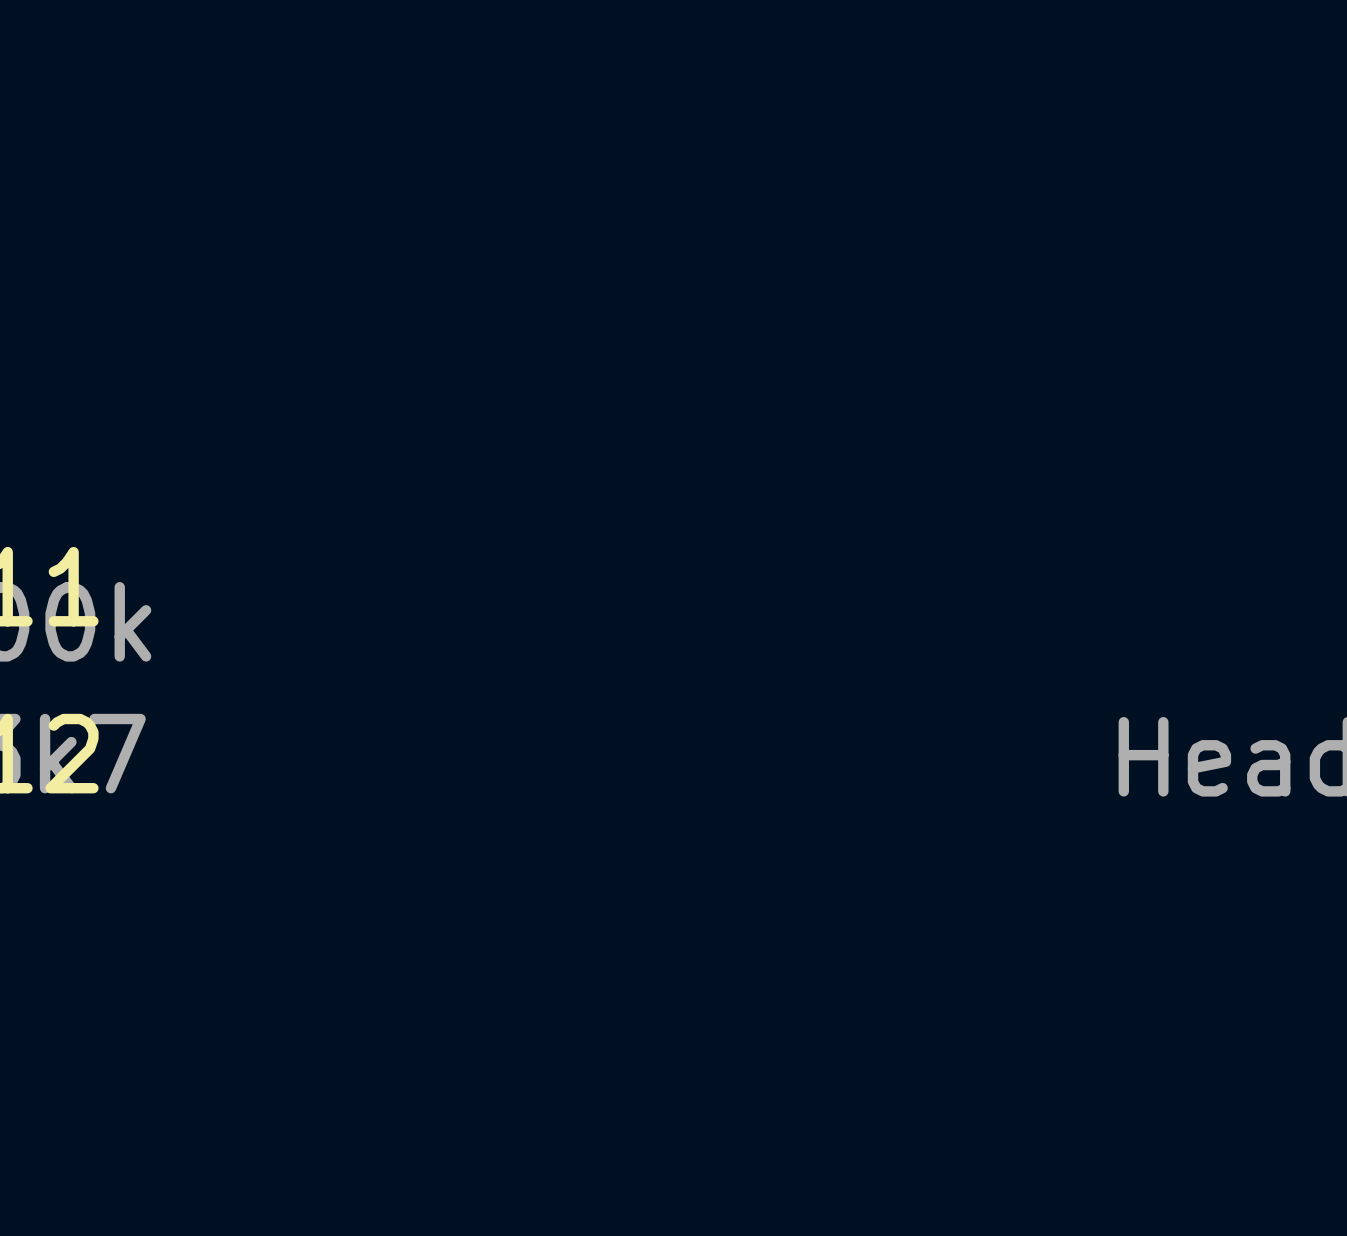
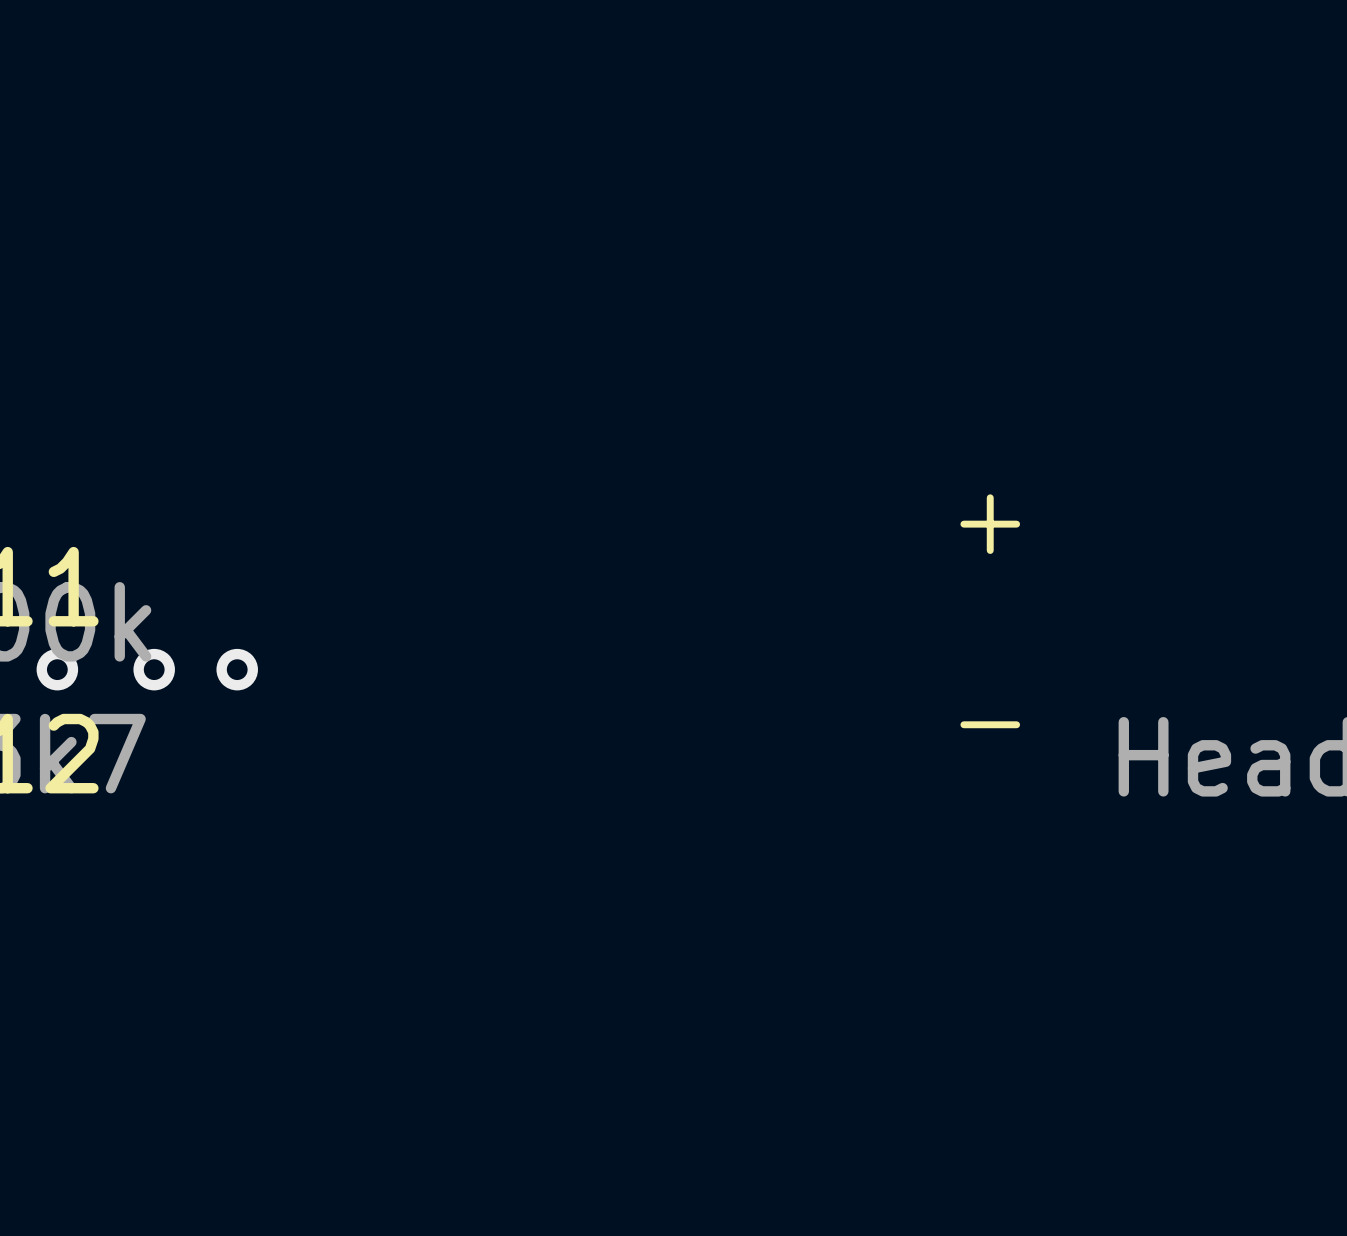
text: none -> + (990, 524)
via: none -> (57, 669)
via: none -> (154, 669)
via: none -> (237, 669)
text: none -> - (990, 724)

